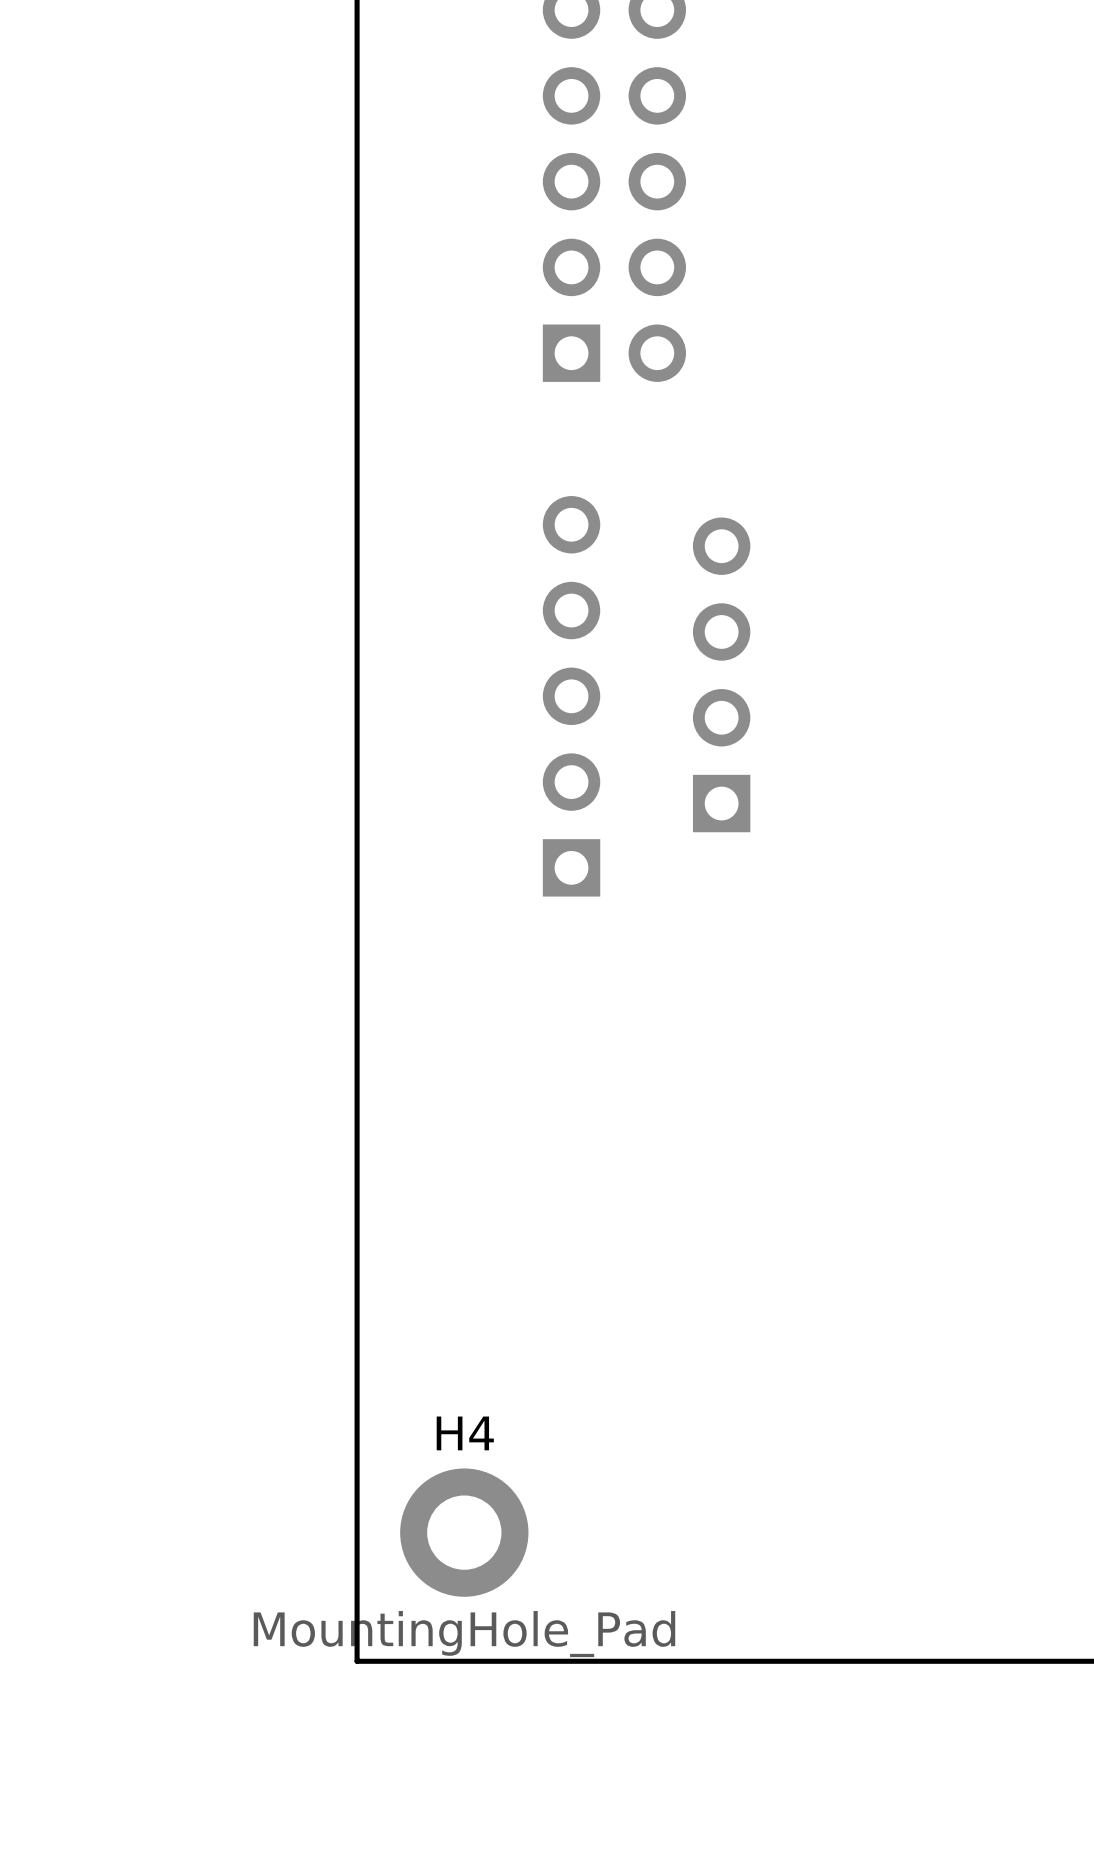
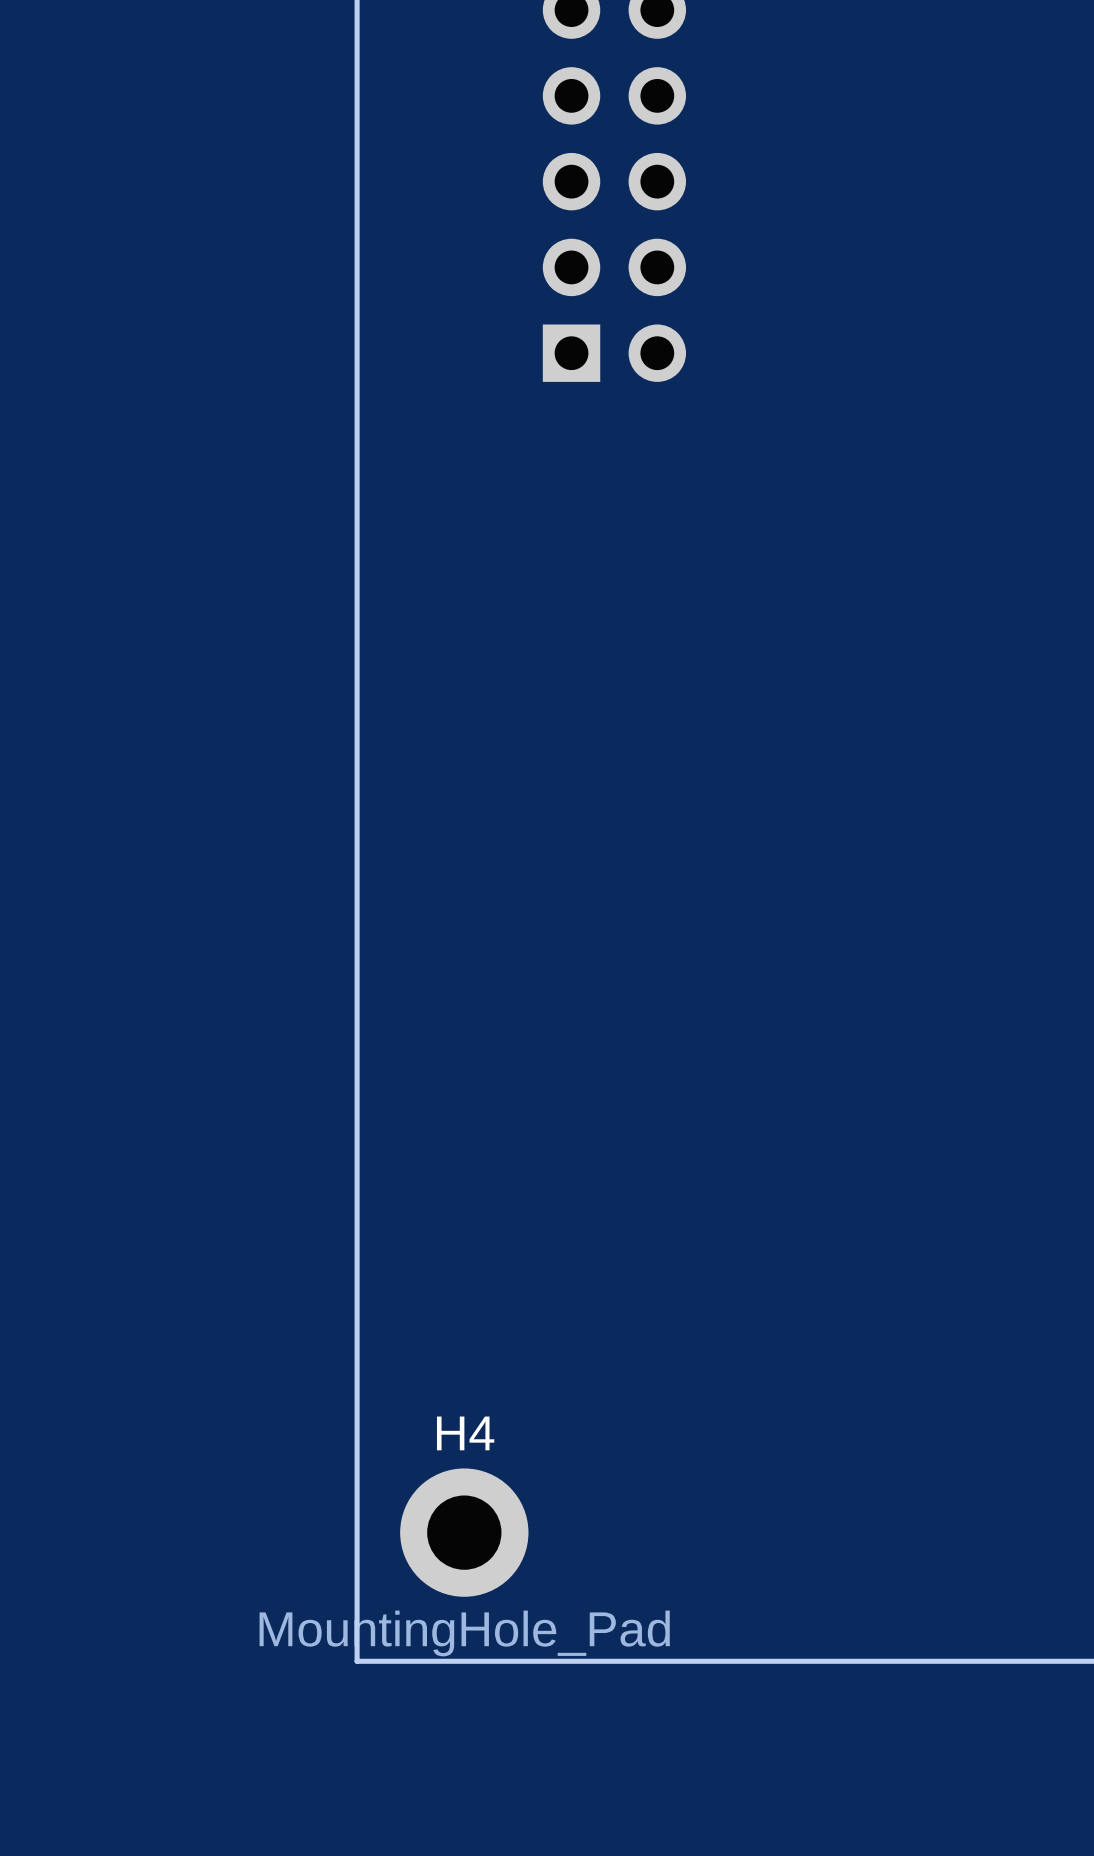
part: (721, 674) -> none
part: (571, 696) -> none

